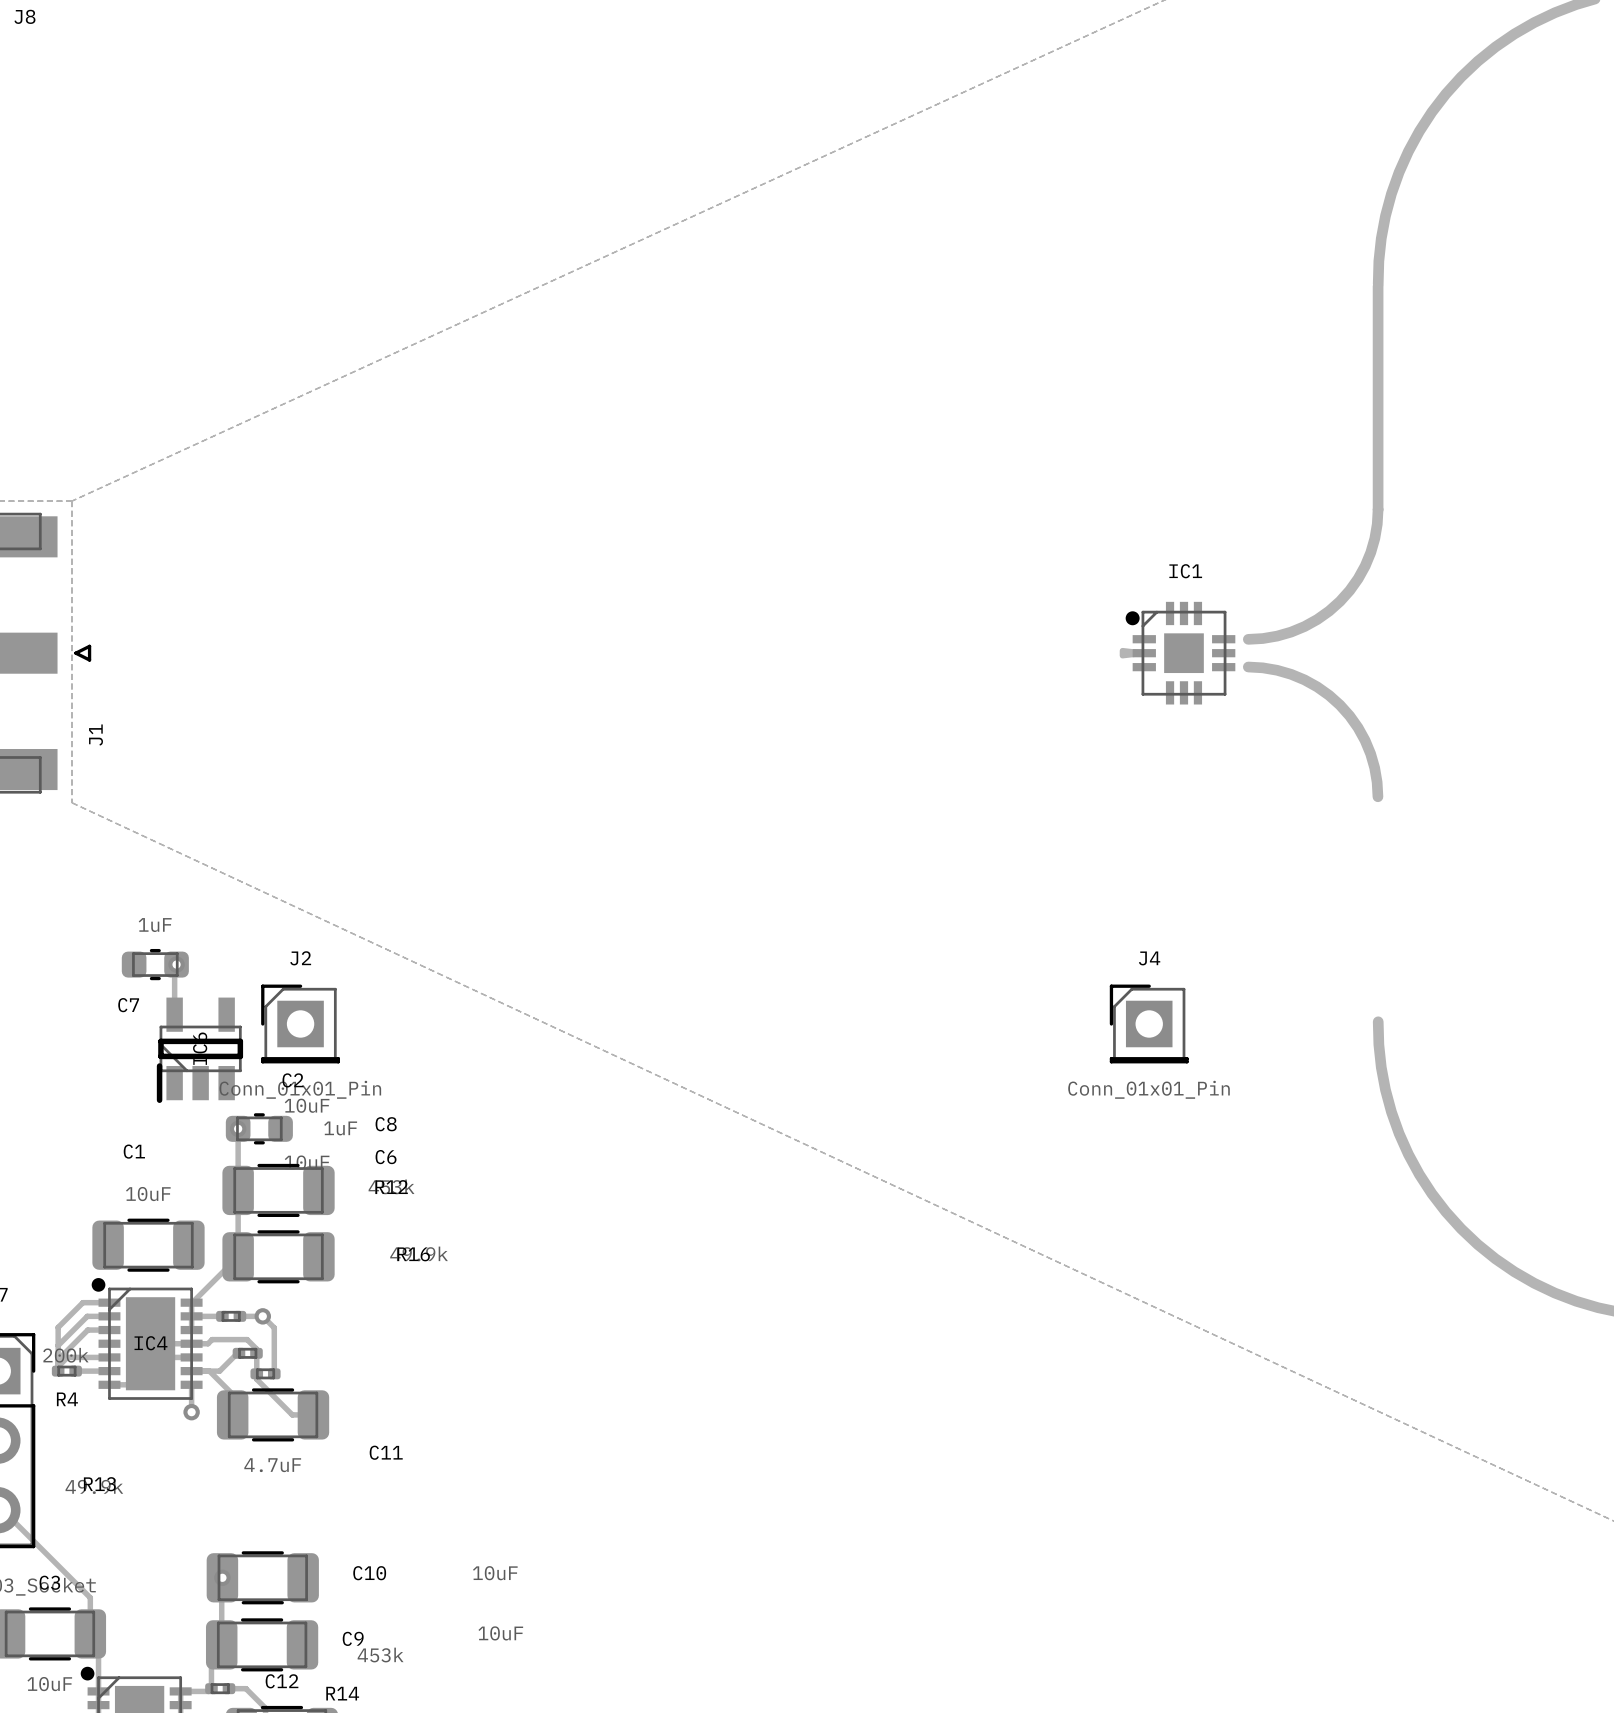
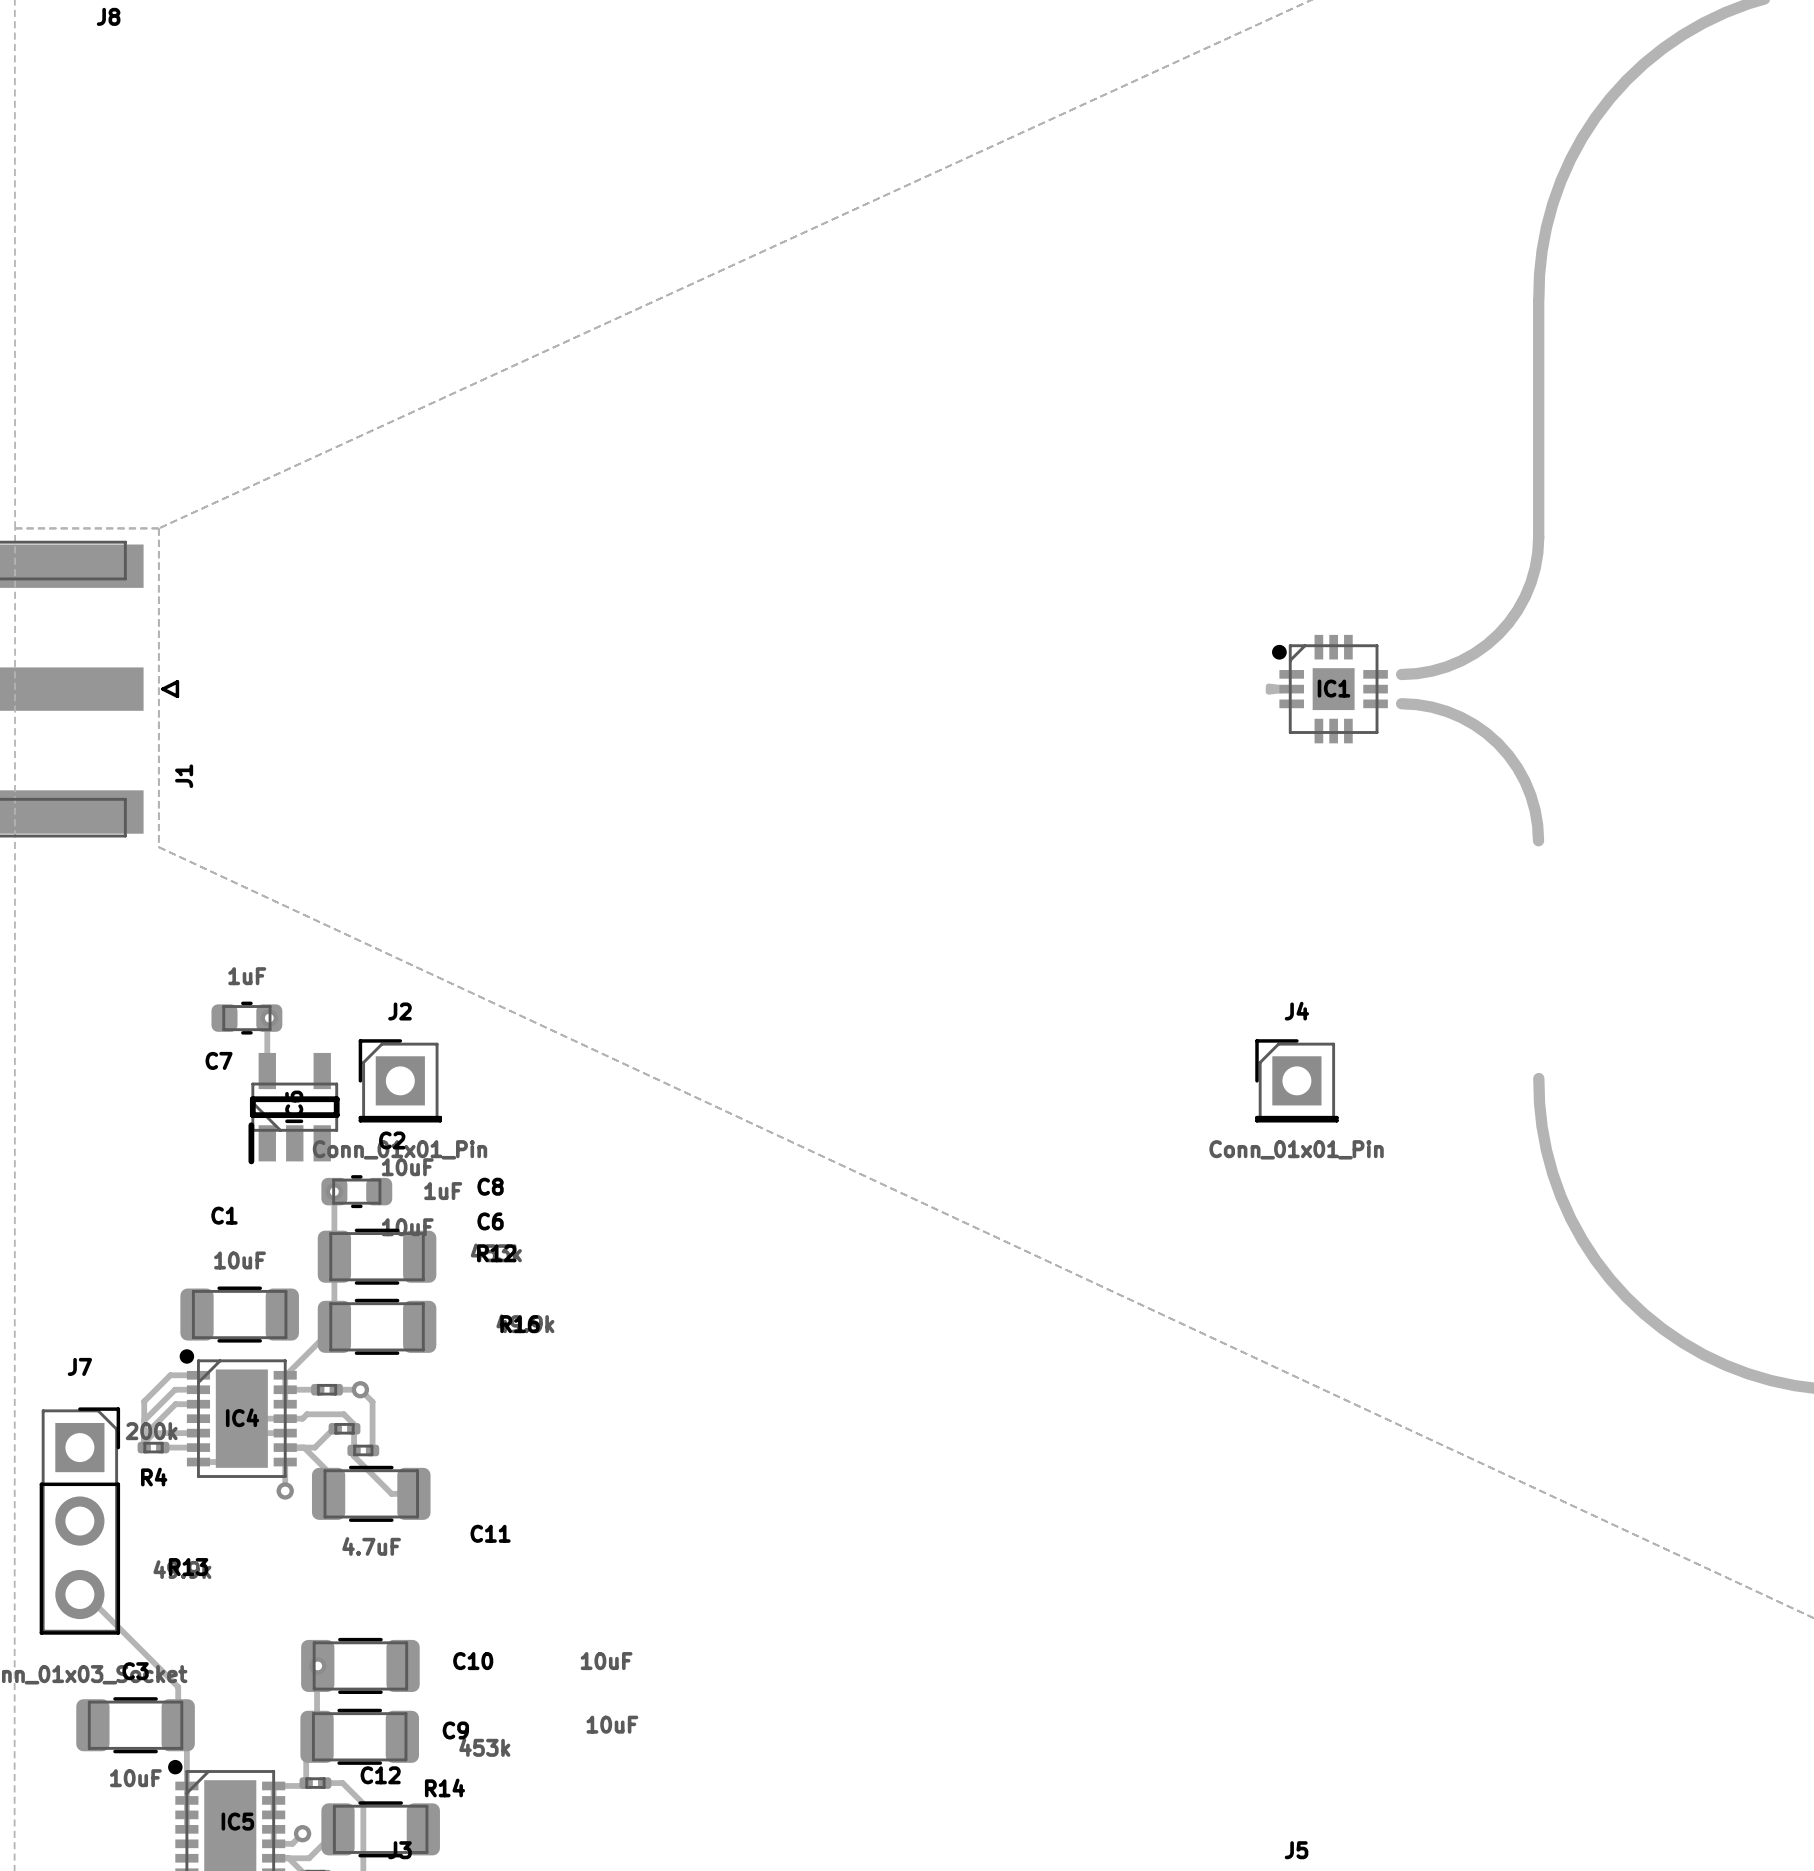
IC1 name position: IC1 (1185, 571) -> IC1 (1333, 688)

